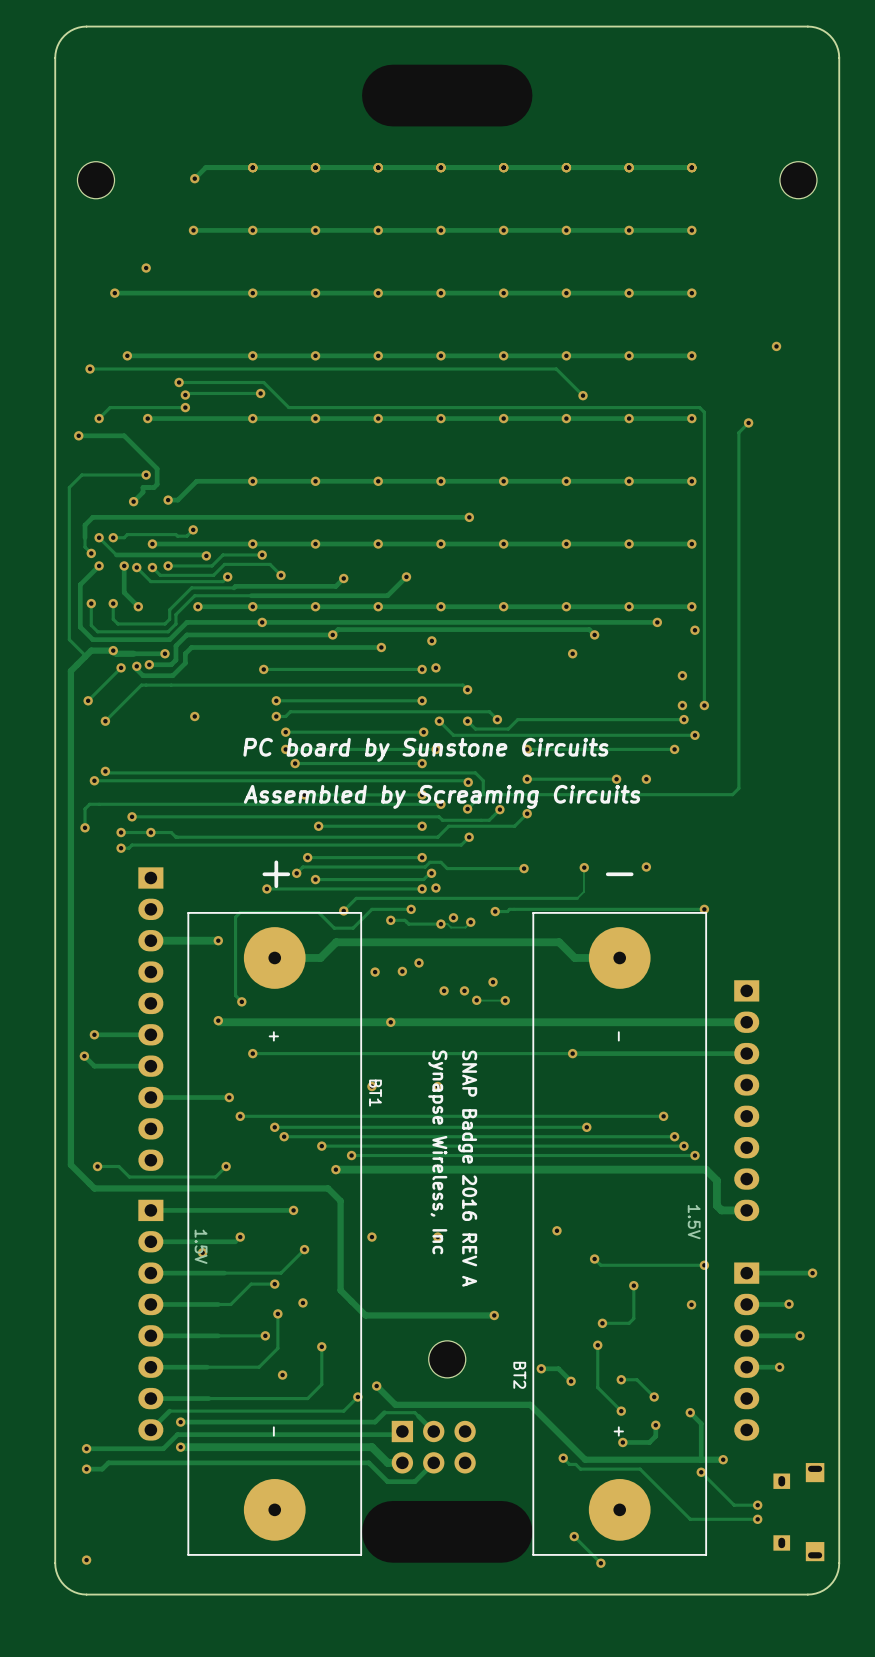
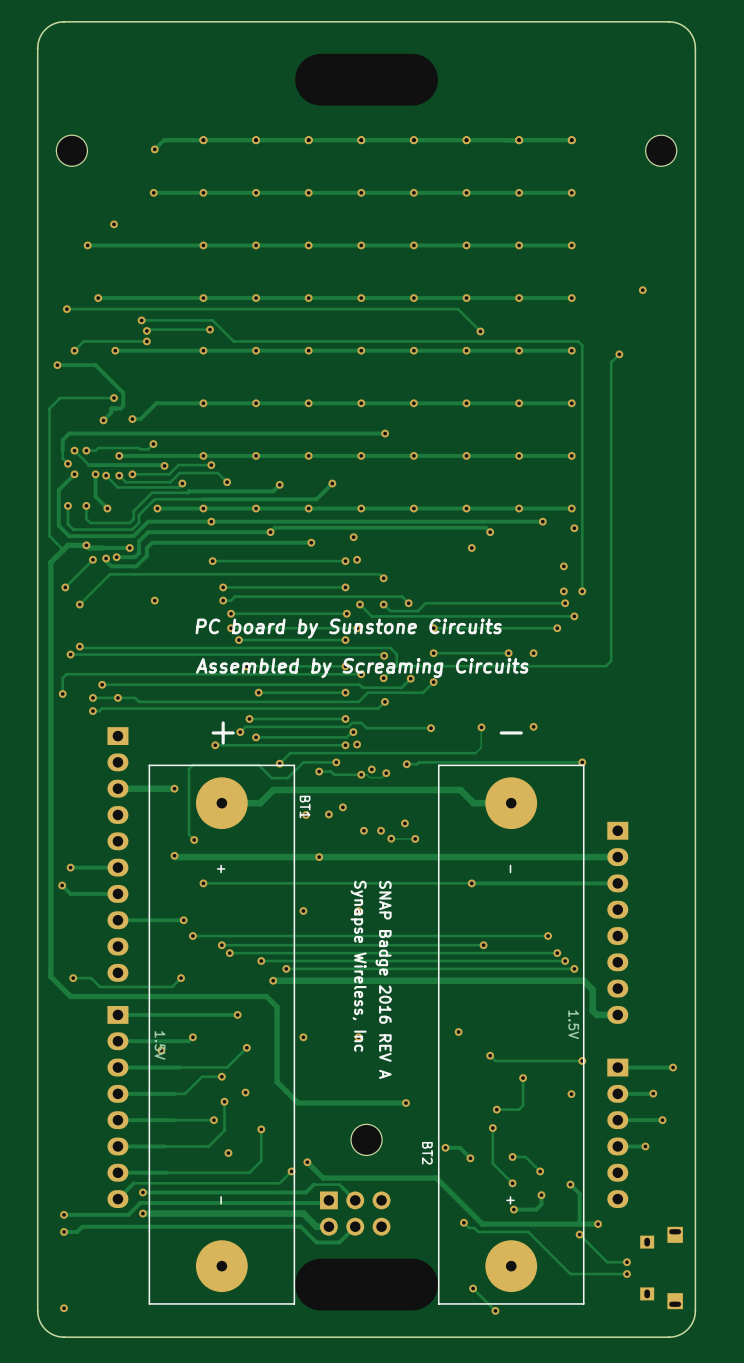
BT1 name position: BT1 (375, 1093) -> BT1 (305, 807)

